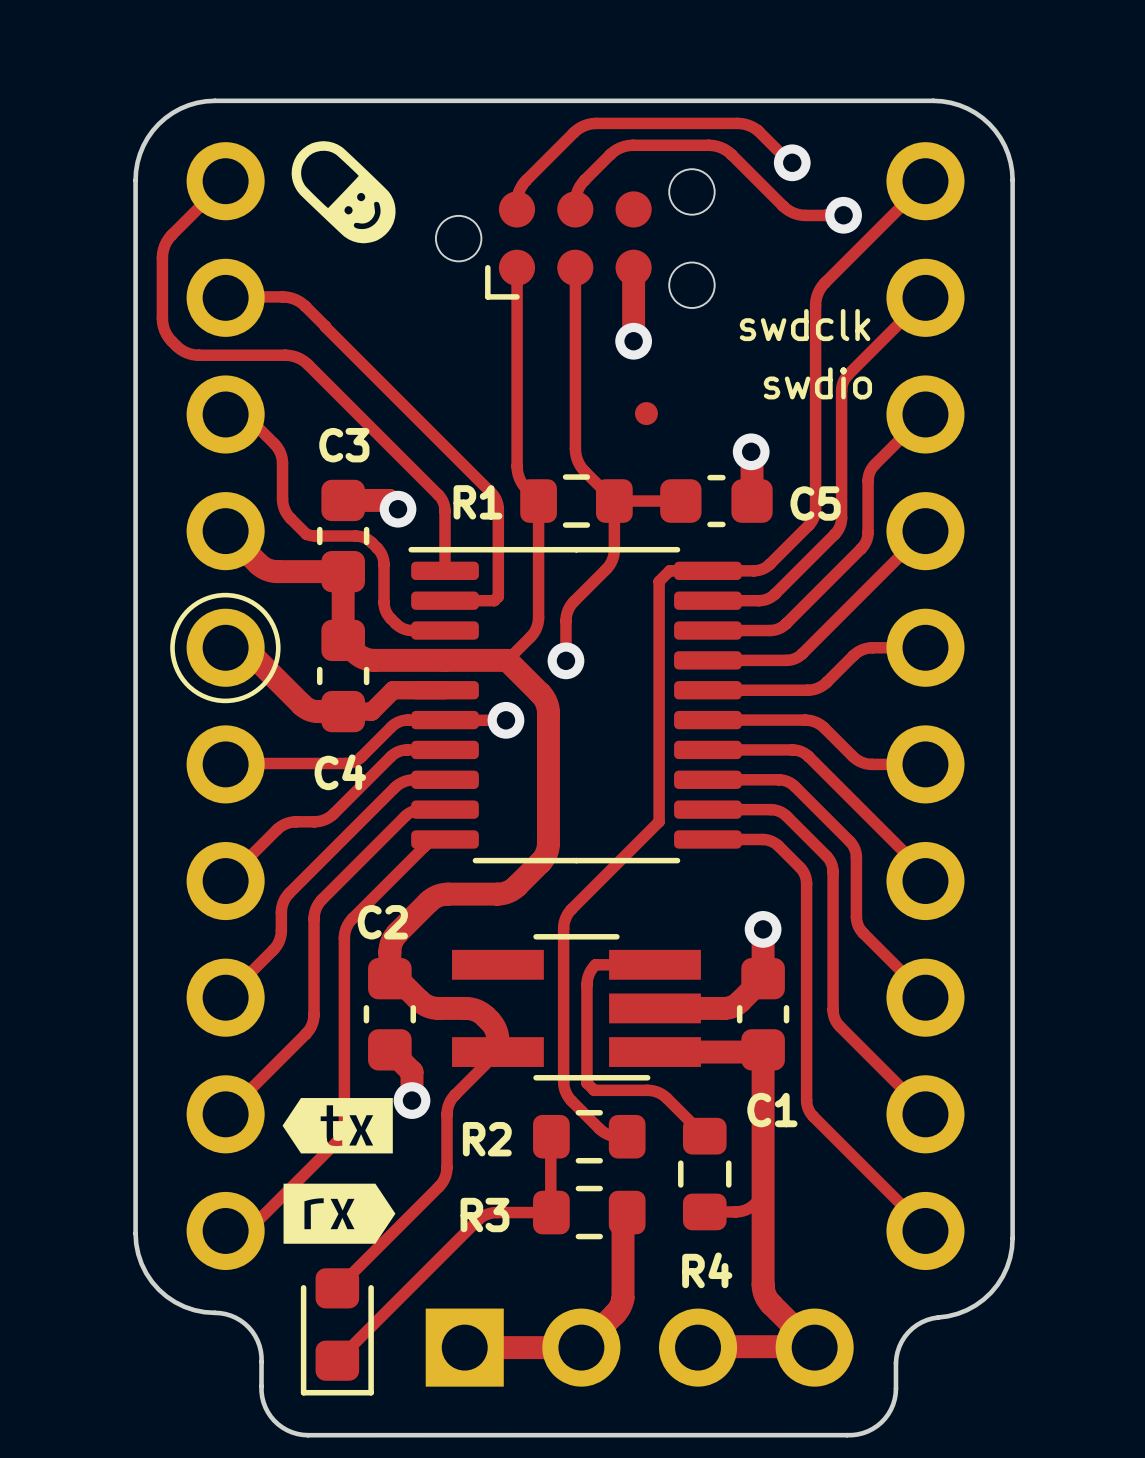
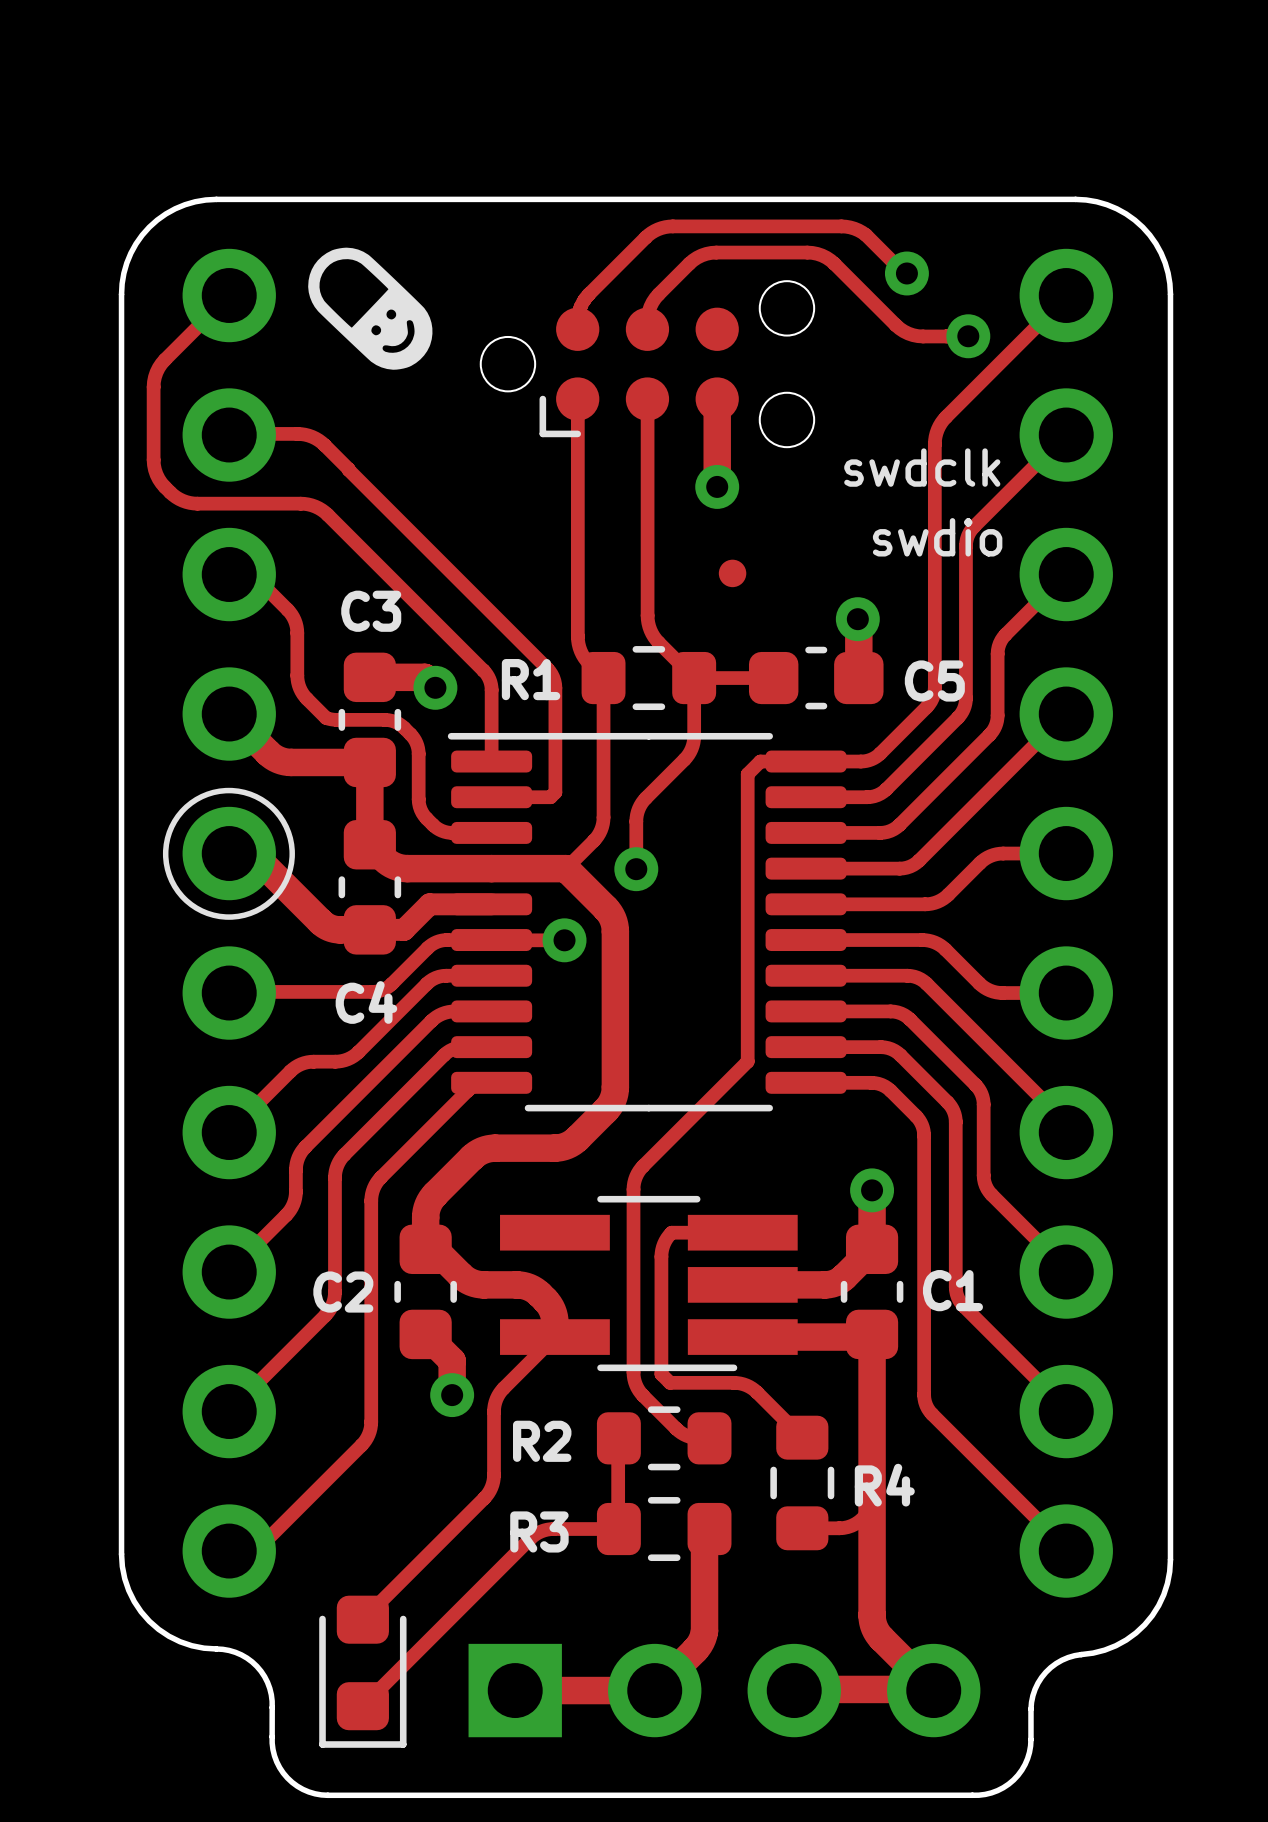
C2 name position: C2 (382, 922) -> C2 (343, 1292)
drawing: [282, 1098, 396, 1244] -> none
C1 name position: C1 (772, 1110) -> C1 (952, 1290)
R4 name position: R4 (707, 1270) -> R4 (884, 1485)

